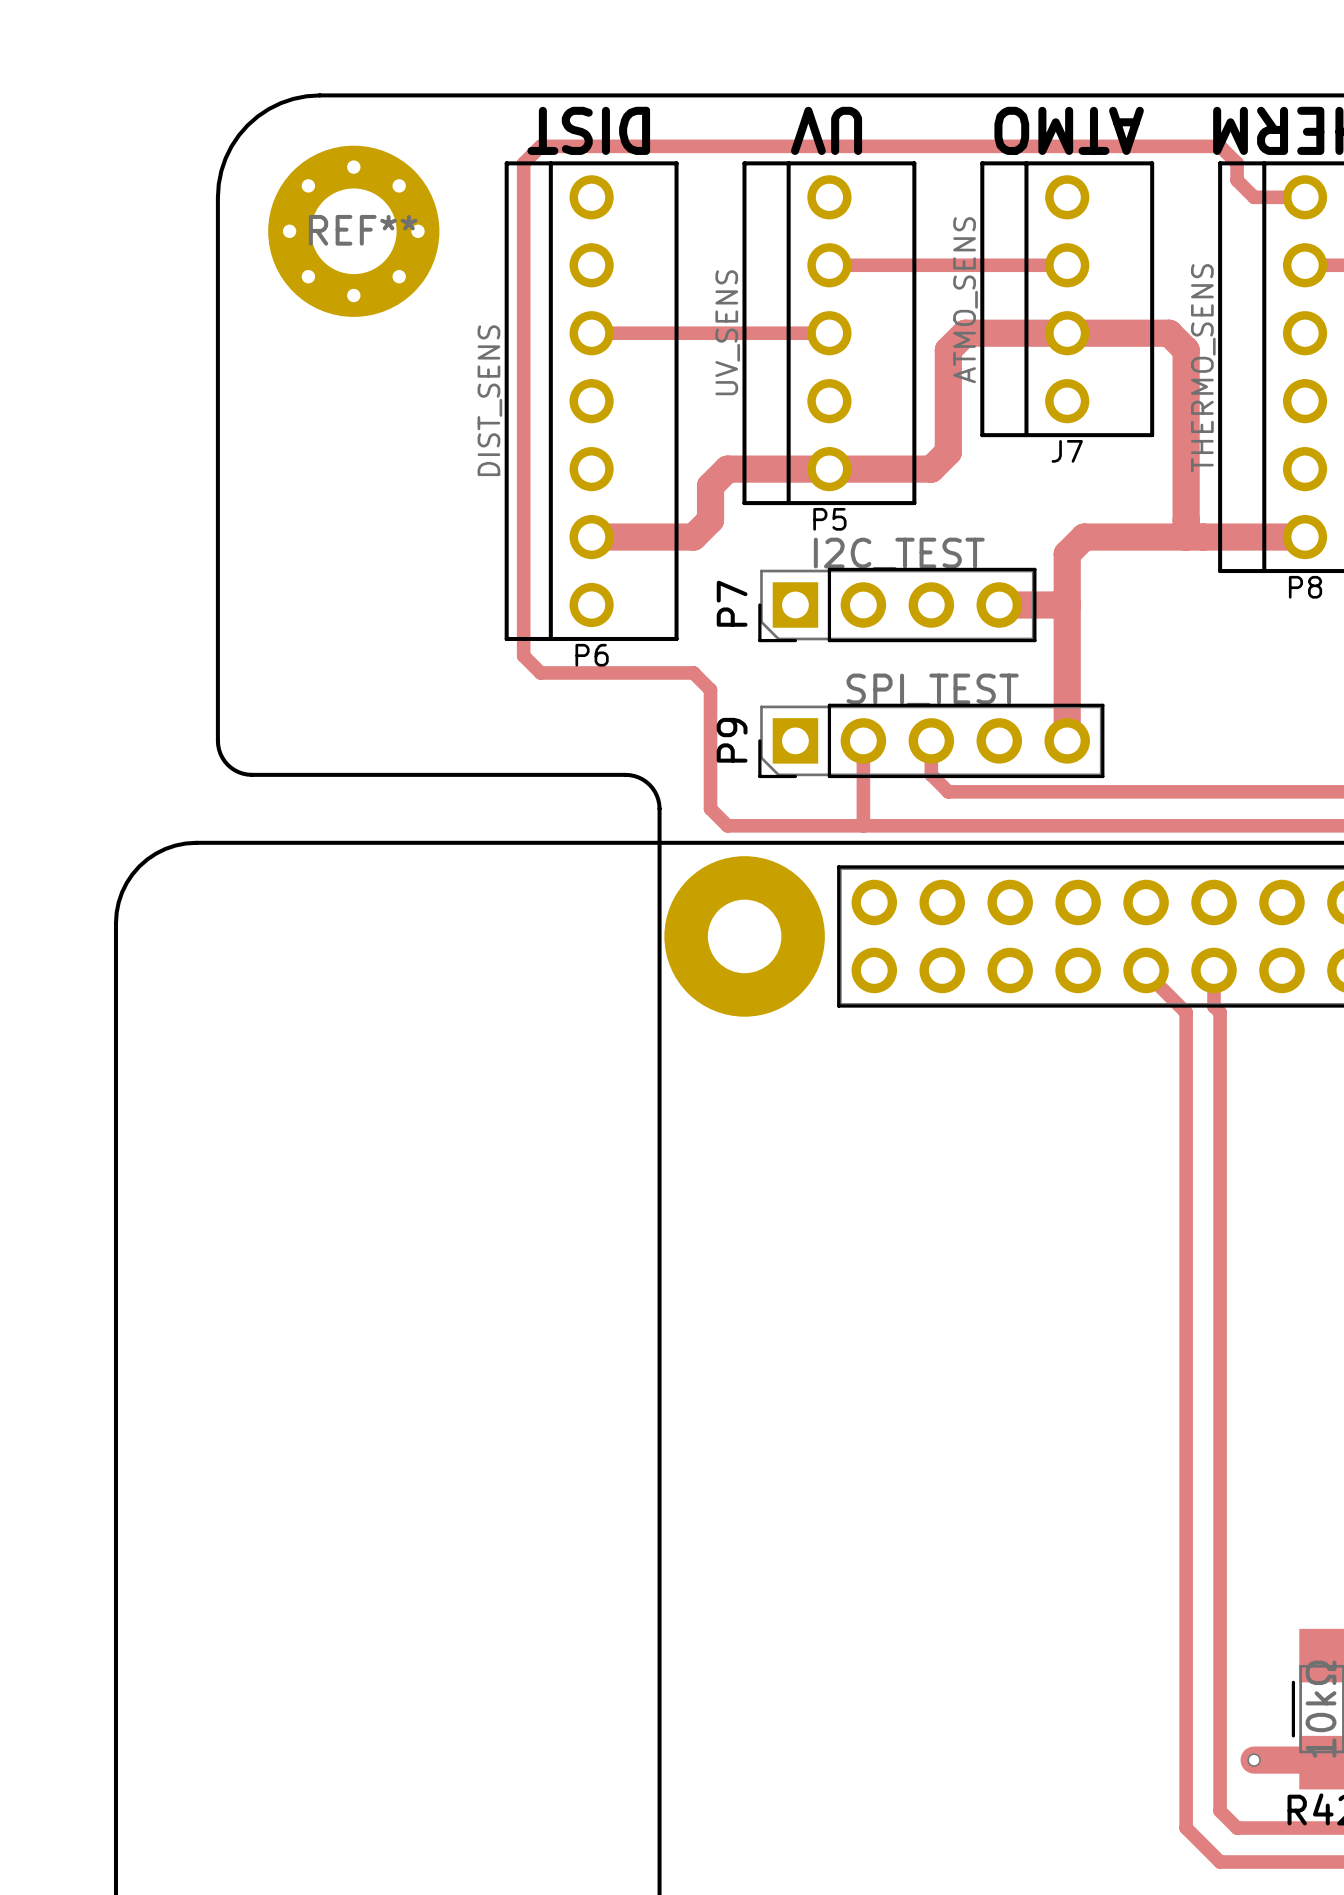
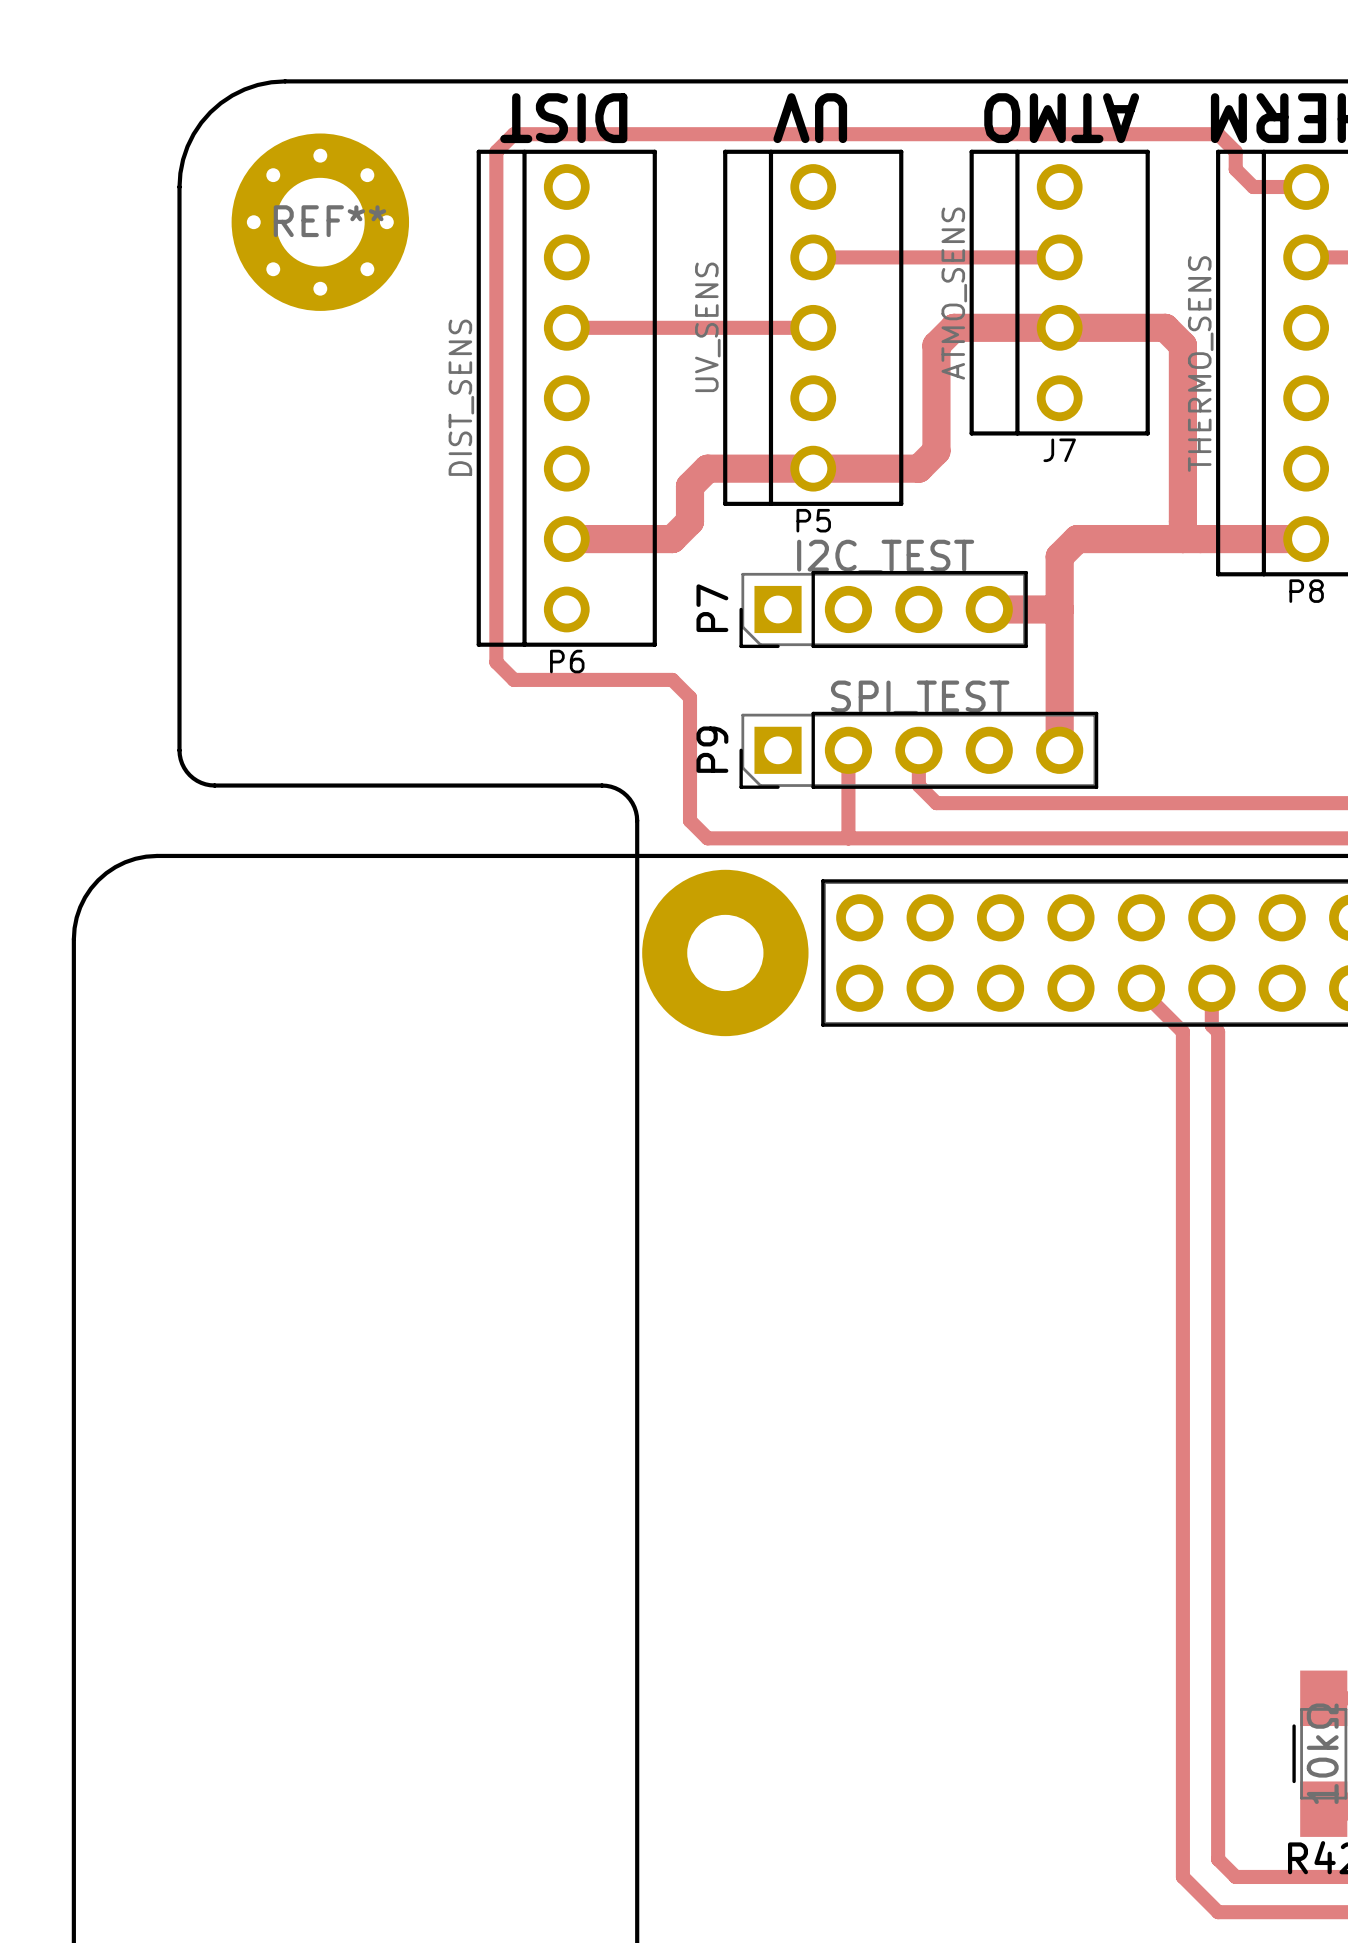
track: (1254, 1760) (1305, 1760) (1307, 1762) (1322, 1762) -> none
via: (1254, 1760) -> none

